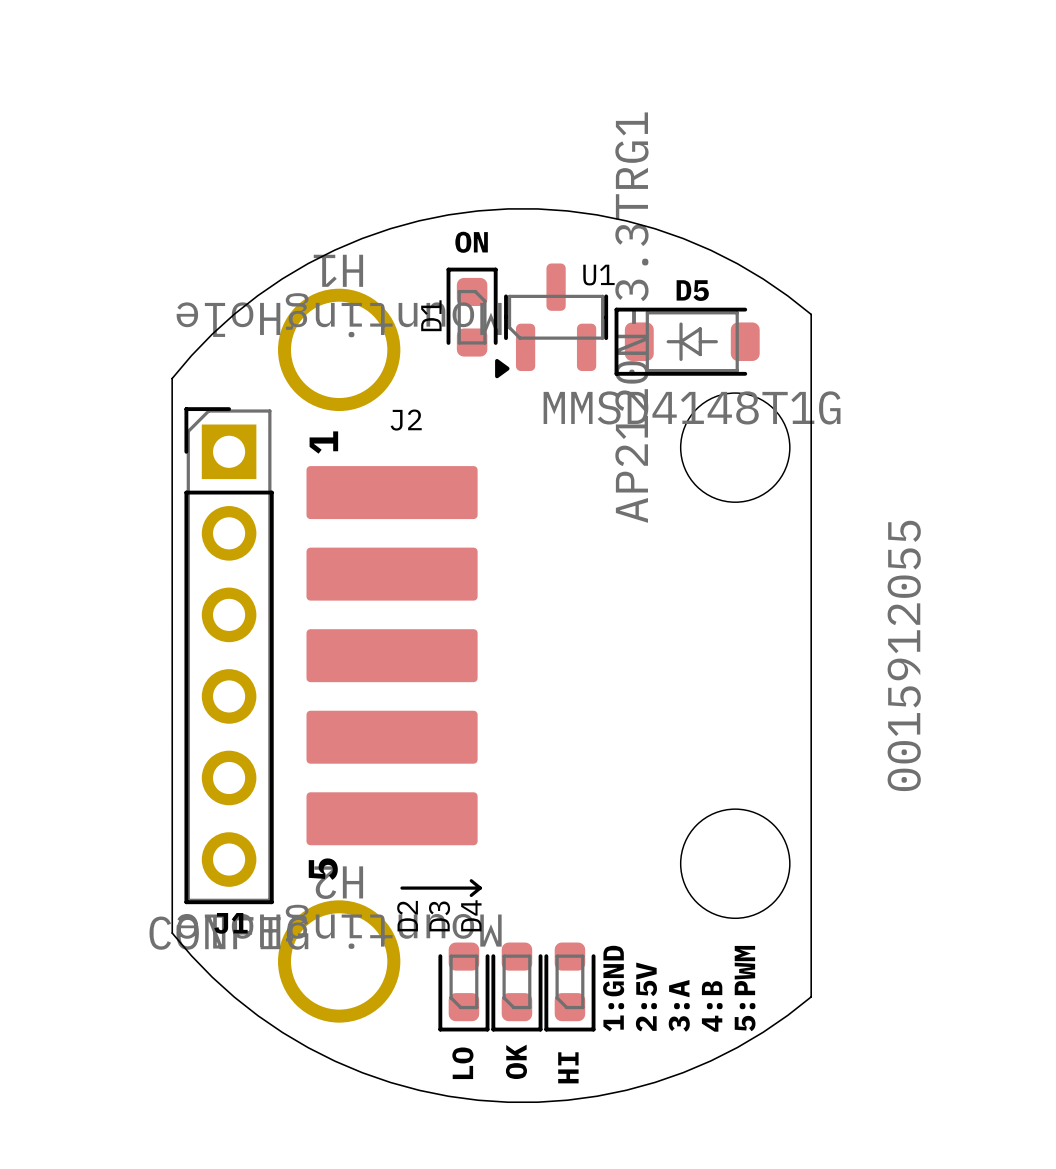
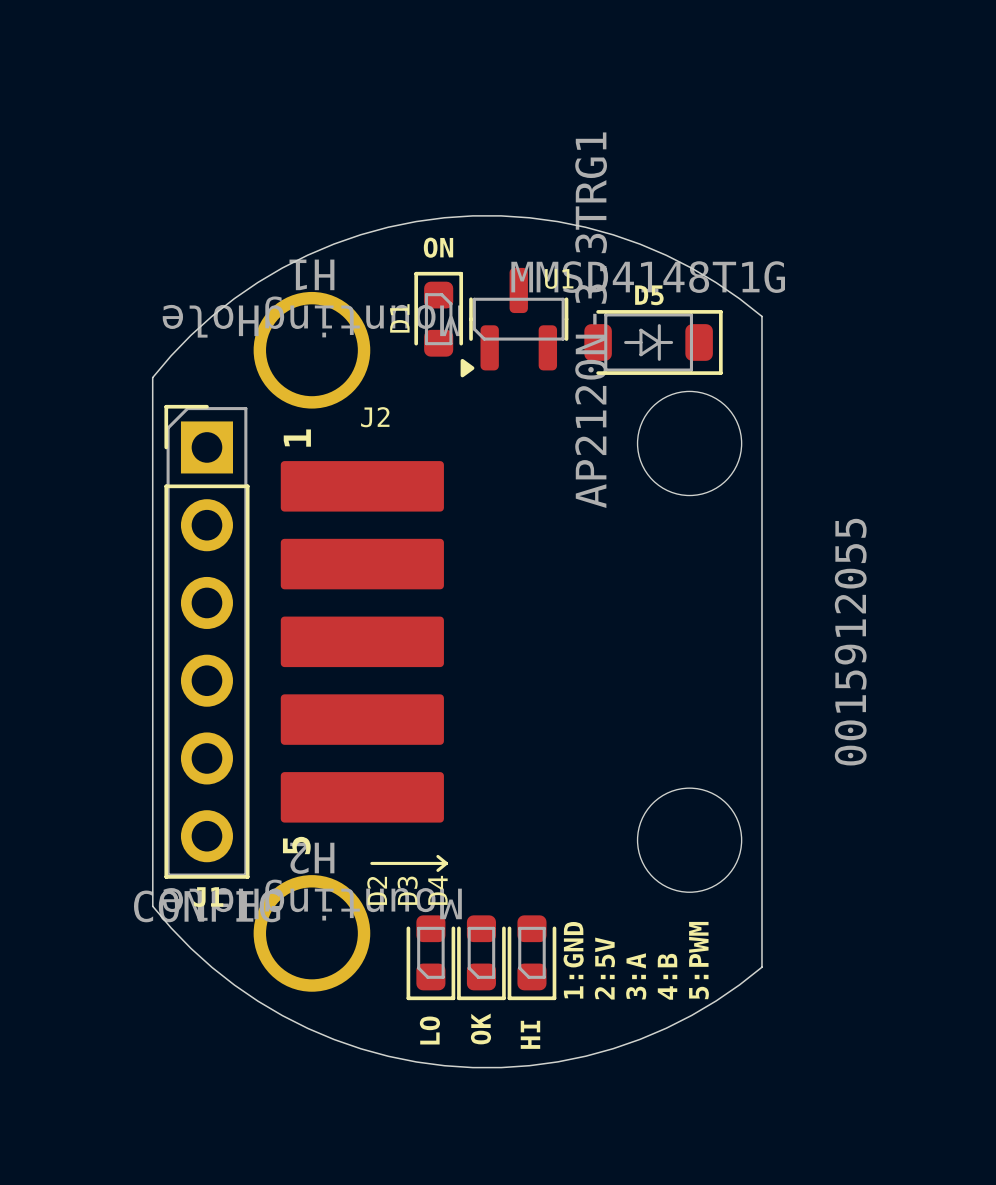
D5 rotation: 0° (687, 341) -> 180° (653, 342)

